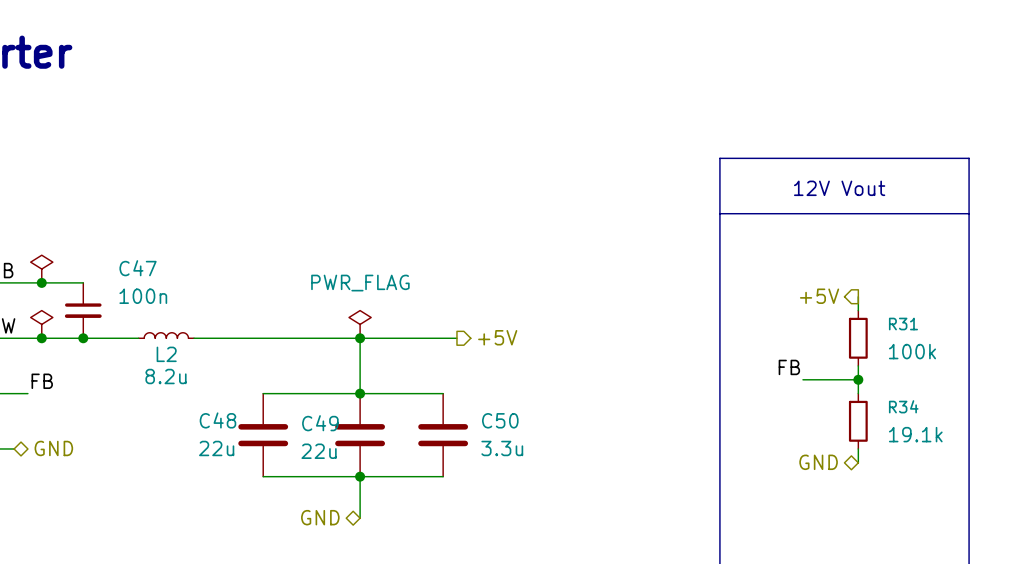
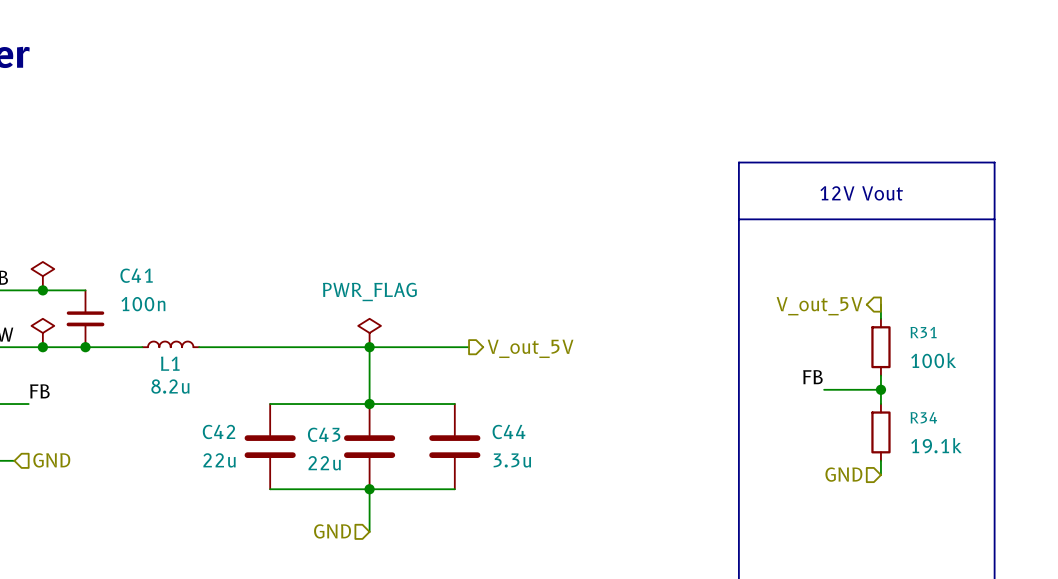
C47 name: C47 (138, 268) -> C41 (136, 275)
hierarchical label: +5V (819, 296) -> V_out_5V (819, 306)
hierarchical label: +5V (497, 337) -> V_out_5V (530, 348)
L2 name: L2 (166, 354) -> L1 (170, 363)
C48 name: C48 (217, 420) -> C42 (219, 431)
C50 name: C50 (500, 420) -> C44 (508, 431)
C49 name: C49 (320, 423) -> C43 (324, 434)
hierarchical label shape: bidirectional (53, 448) -> input (51, 460)
hierarchical label shape: bidirectional (818, 462) -> input (843, 474)
hierarchical label shape: bidirectional (320, 517) -> input (332, 531)

